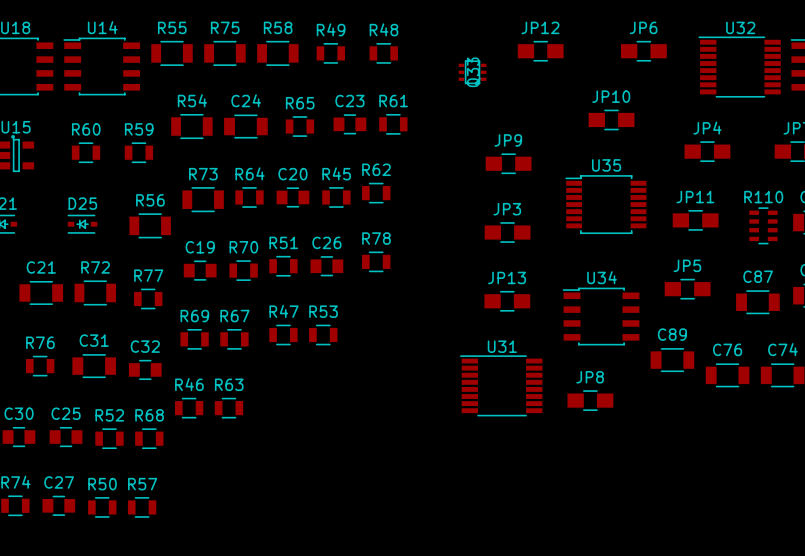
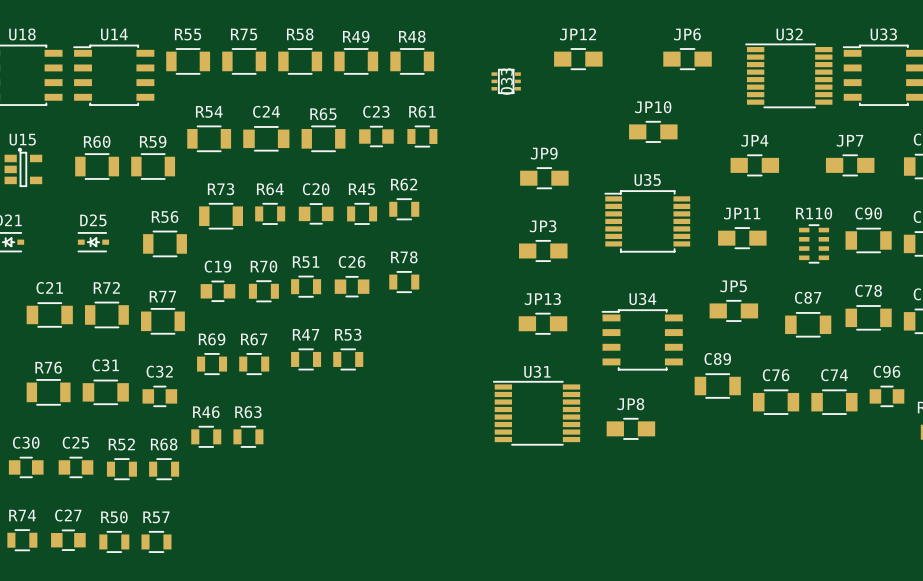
R49 footprint: [316, 43, 346, 64] -> [334, 48, 379, 75]
R48 footprint: [369, 43, 398, 64] -> [390, 48, 435, 75]
R65 footprint: [285, 116, 315, 137] -> [301, 125, 346, 153]
R60 footprint: [71, 142, 101, 164] -> [75, 153, 120, 180]
R59 footprint: [124, 142, 154, 164] -> [131, 153, 176, 180]
R77 footprint: [134, 288, 163, 310] -> [141, 308, 185, 335]
R76 footprint: [25, 355, 55, 377] -> [26, 379, 71, 406]

